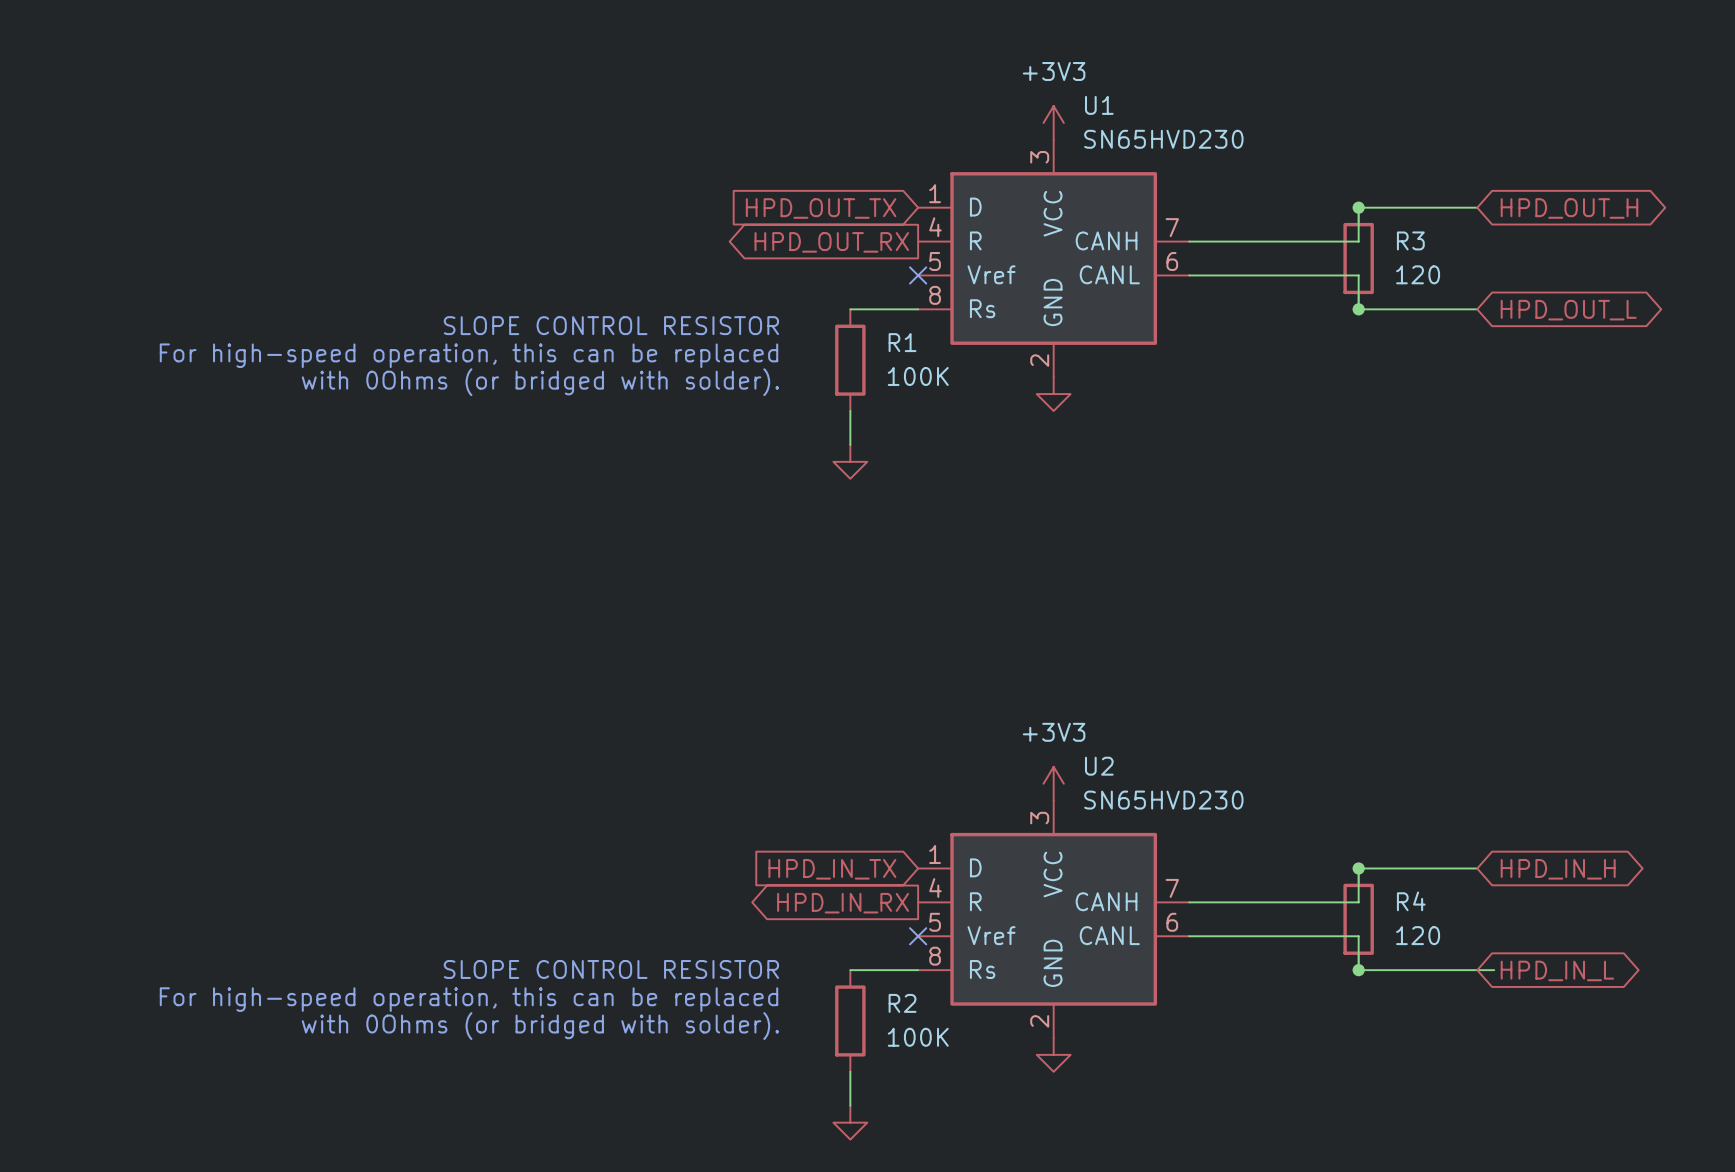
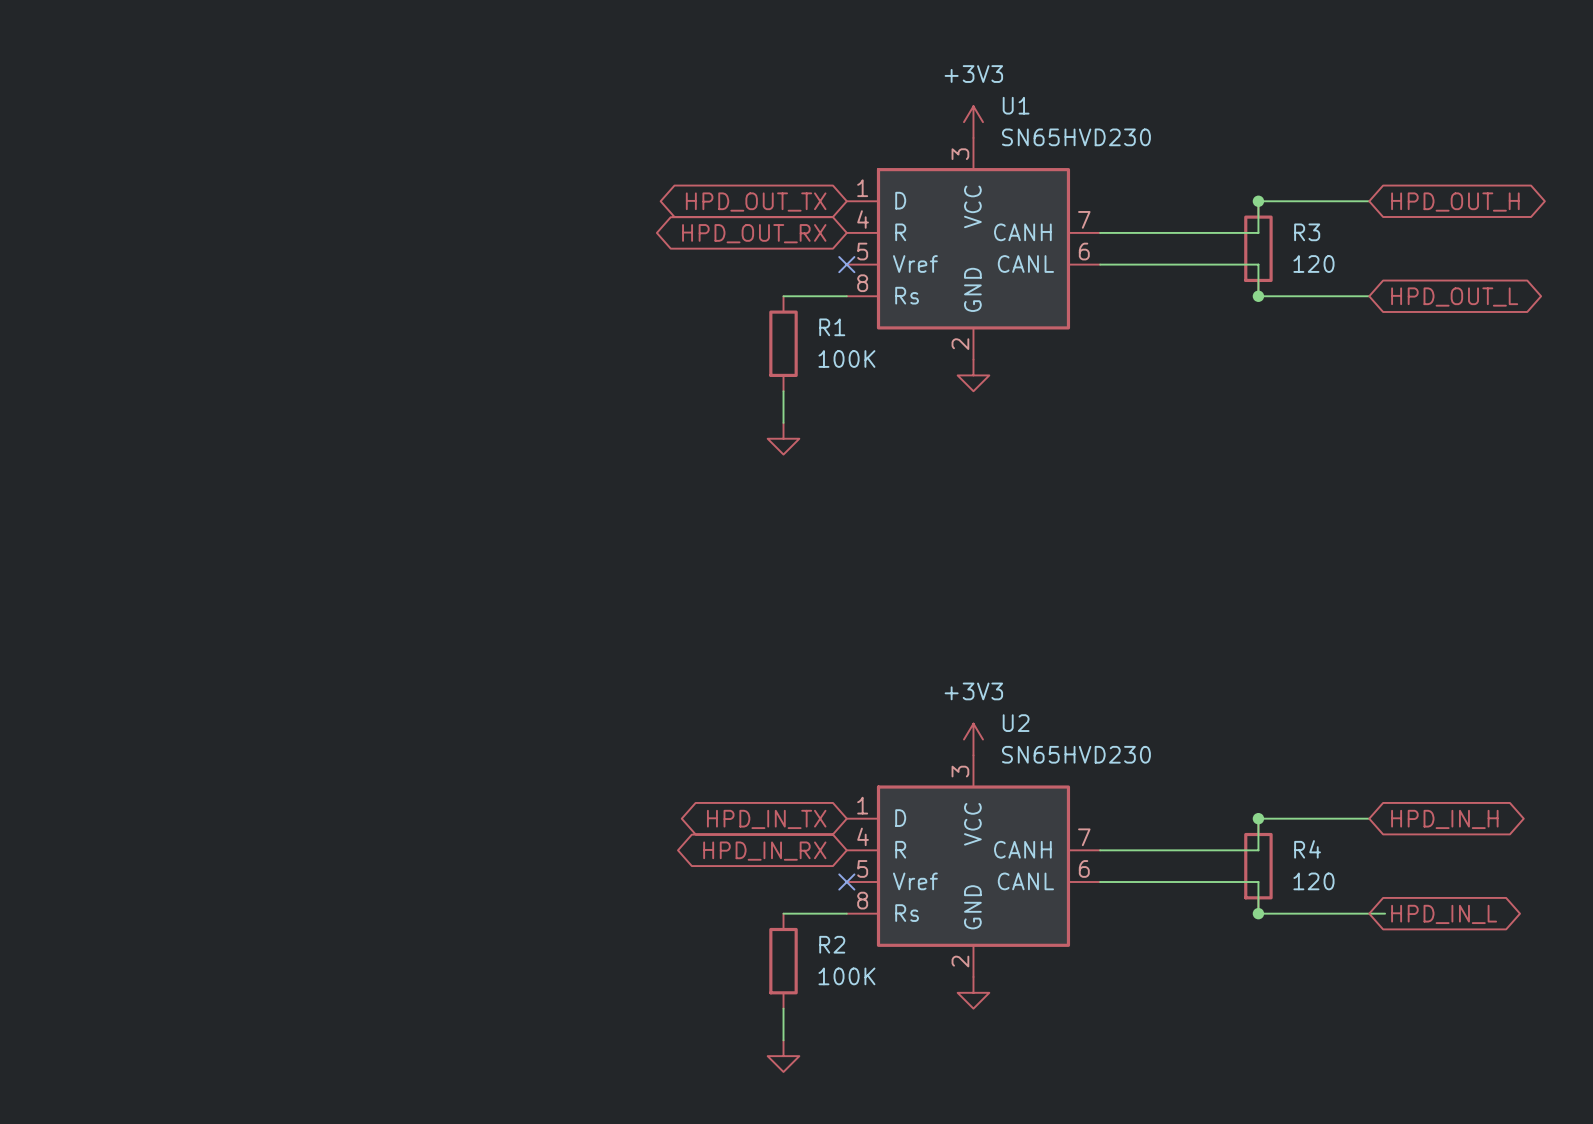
global label shape: input (821, 208) -> bidirectional (756, 202)
global label shape: output (831, 242) -> bidirectional (754, 233)
text: SLOPE CONTROL RESISTOR (611, 325) -> none
text: For high-speed operation, this can be replaced (468, 355) -> none
text: with 0Ohms (or bridged with solder). (540, 382) -> none
global label shape: input (832, 869) -> bidirectional (766, 819)
global label shape: output (843, 903) -> bidirectional (764, 851)
text: SLOPE CONTROL RESISTOR (611, 969) -> none
text: For high-speed operation, this can be replaced (468, 999) -> none
text: with 0Ohms (or bridged with solder). (540, 1026) -> none

